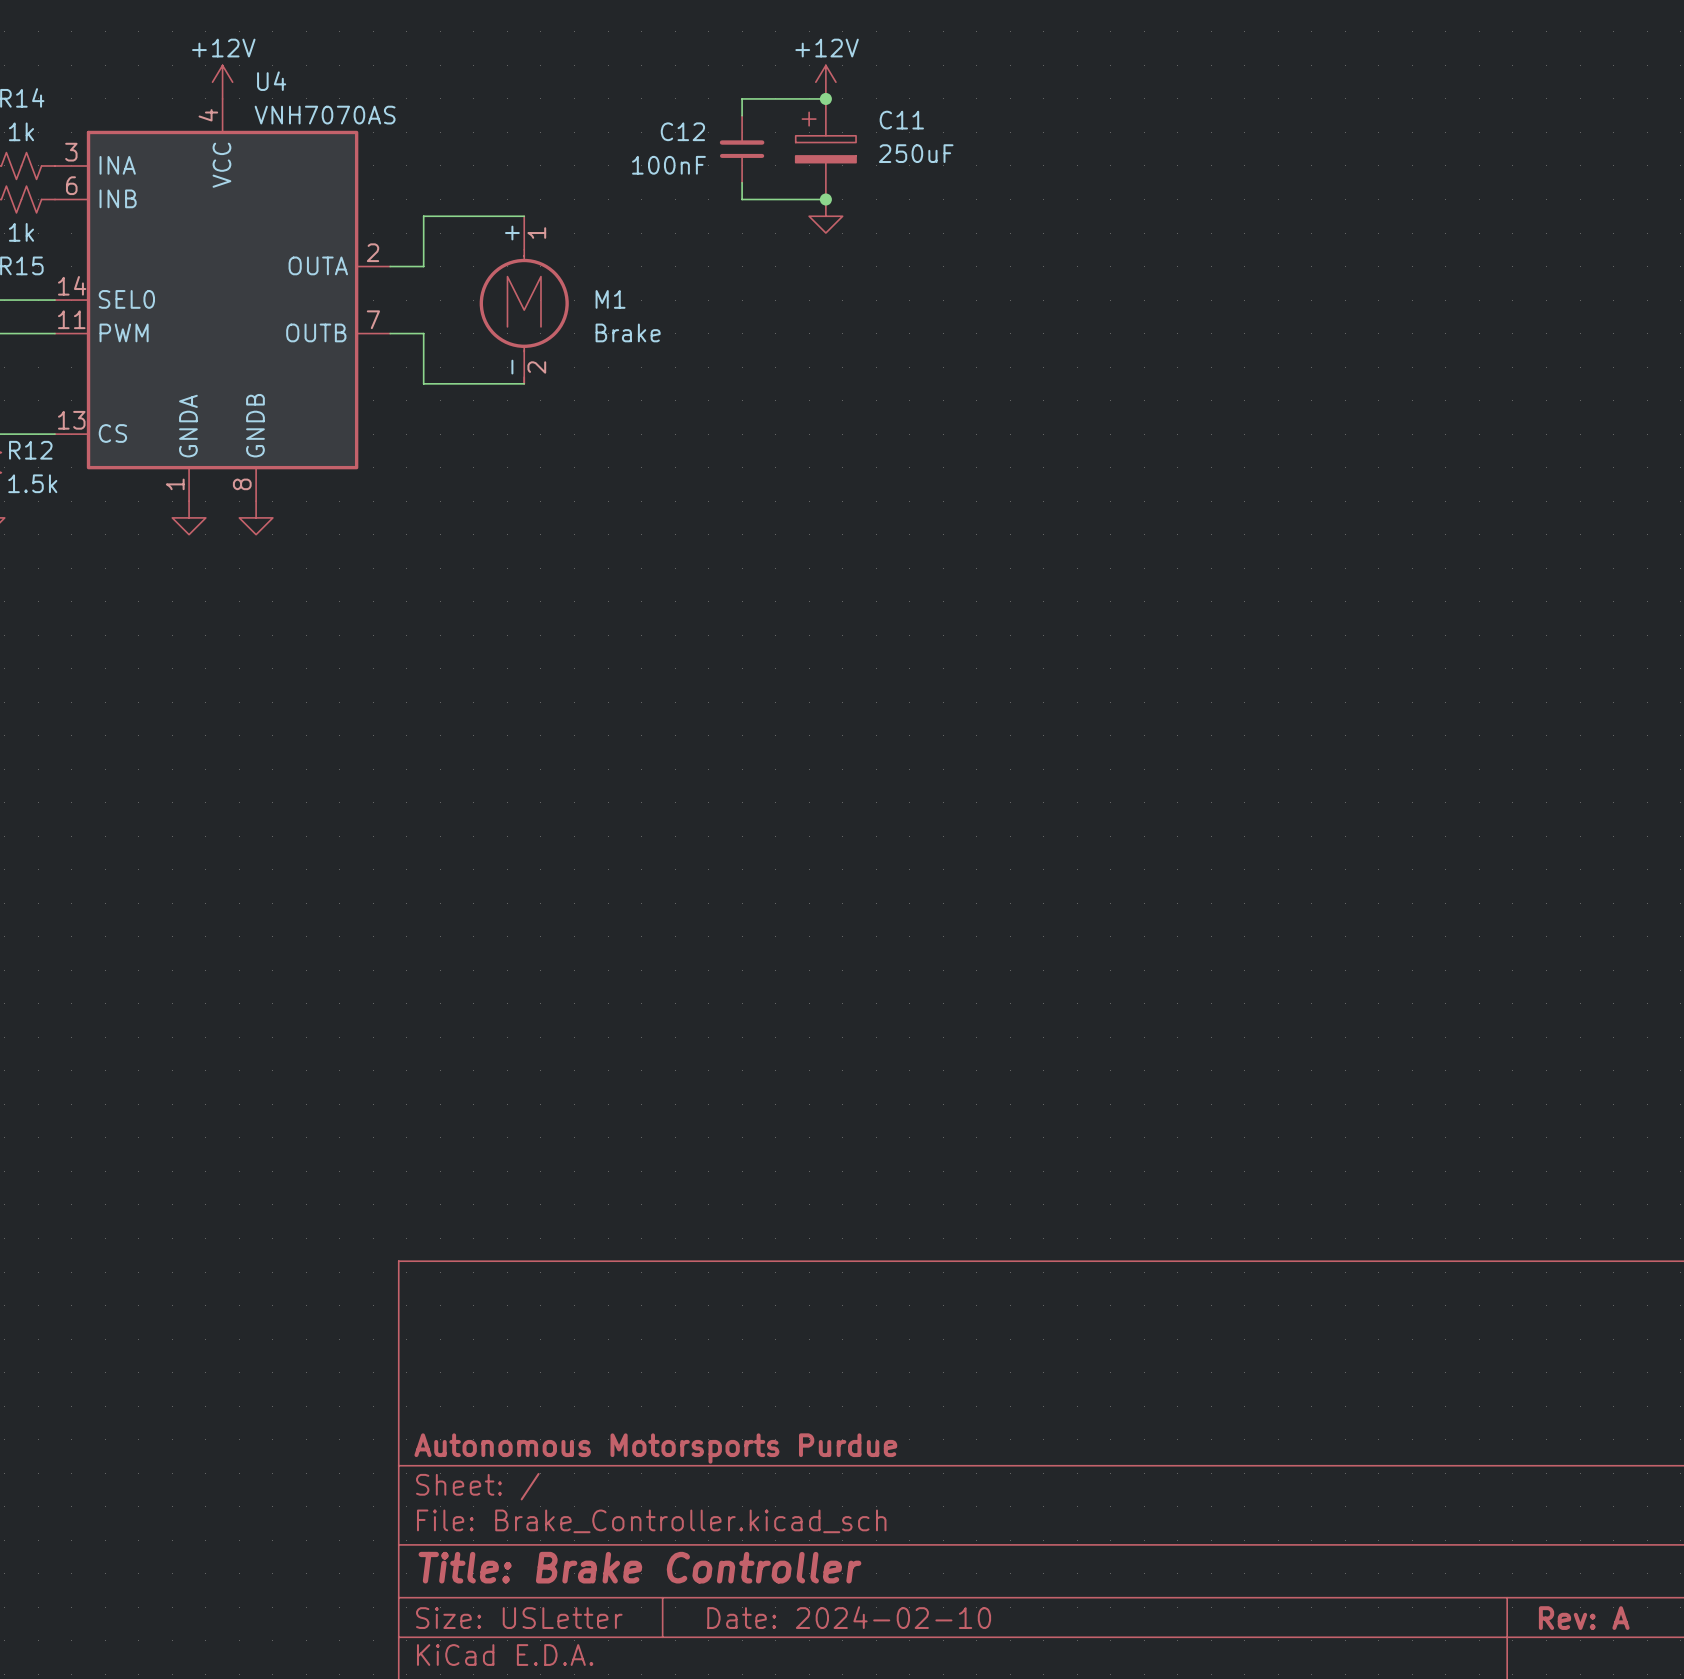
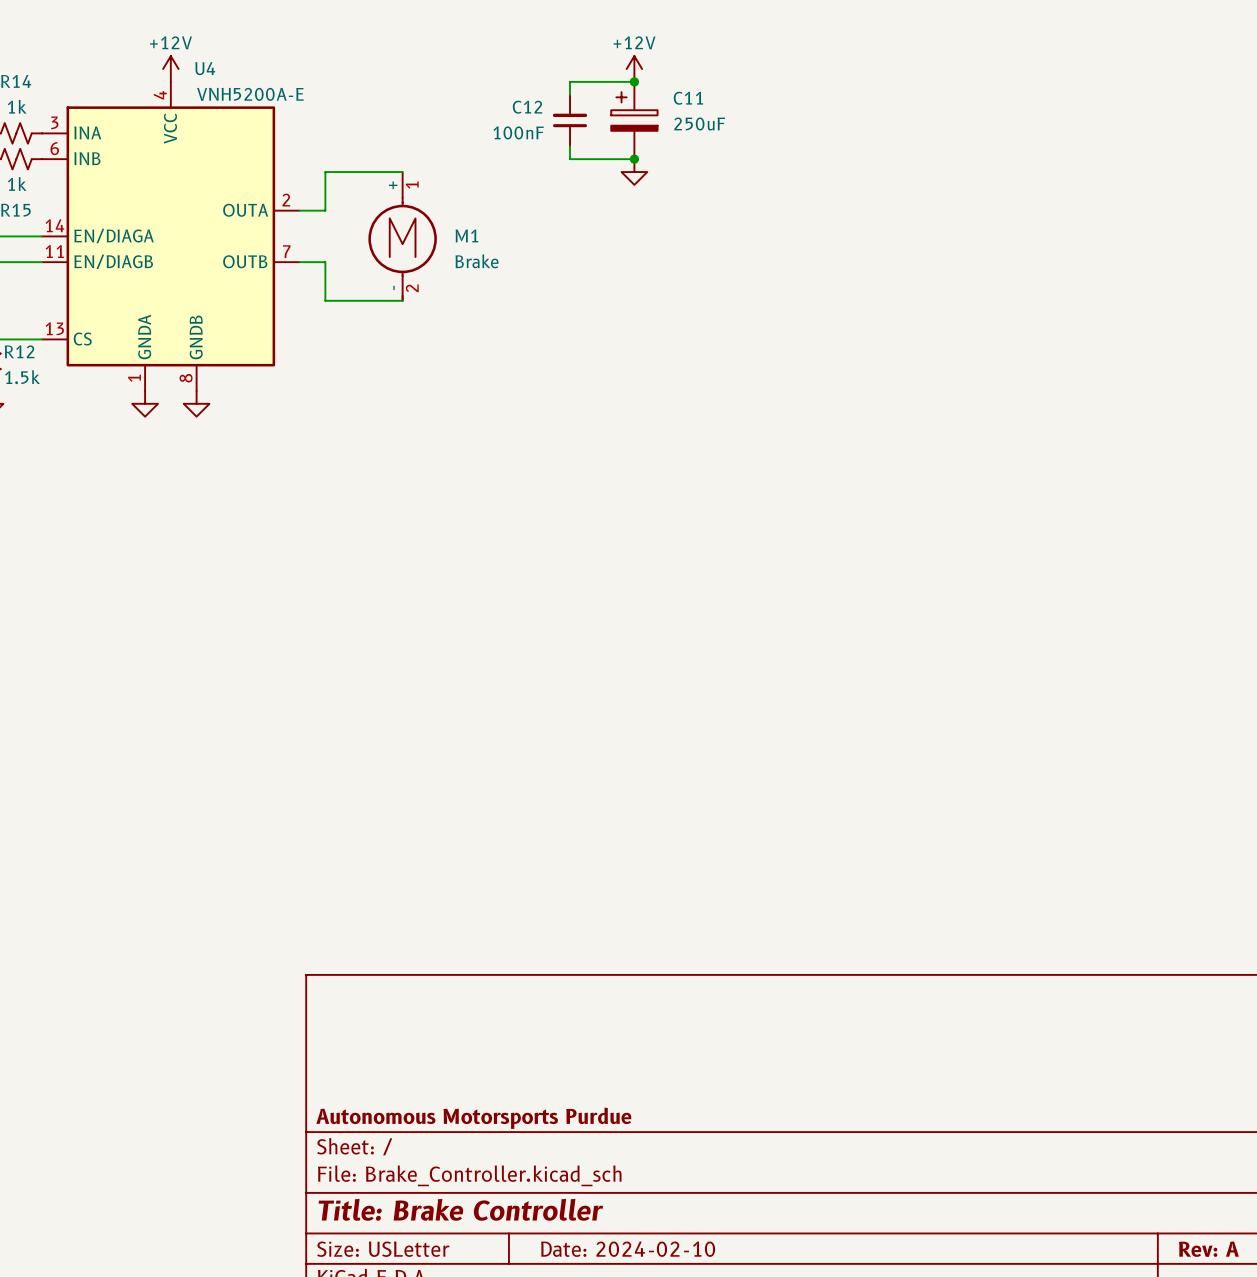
U4 value: VNH7070AS (325, 115) -> VNH5200A-E (250, 94)
U4 pin name: SEL0 (126, 299) -> EN/DIAGA (114, 236)
U4 pin name: PWM (124, 332) -> EN/DIAGB (113, 261)

